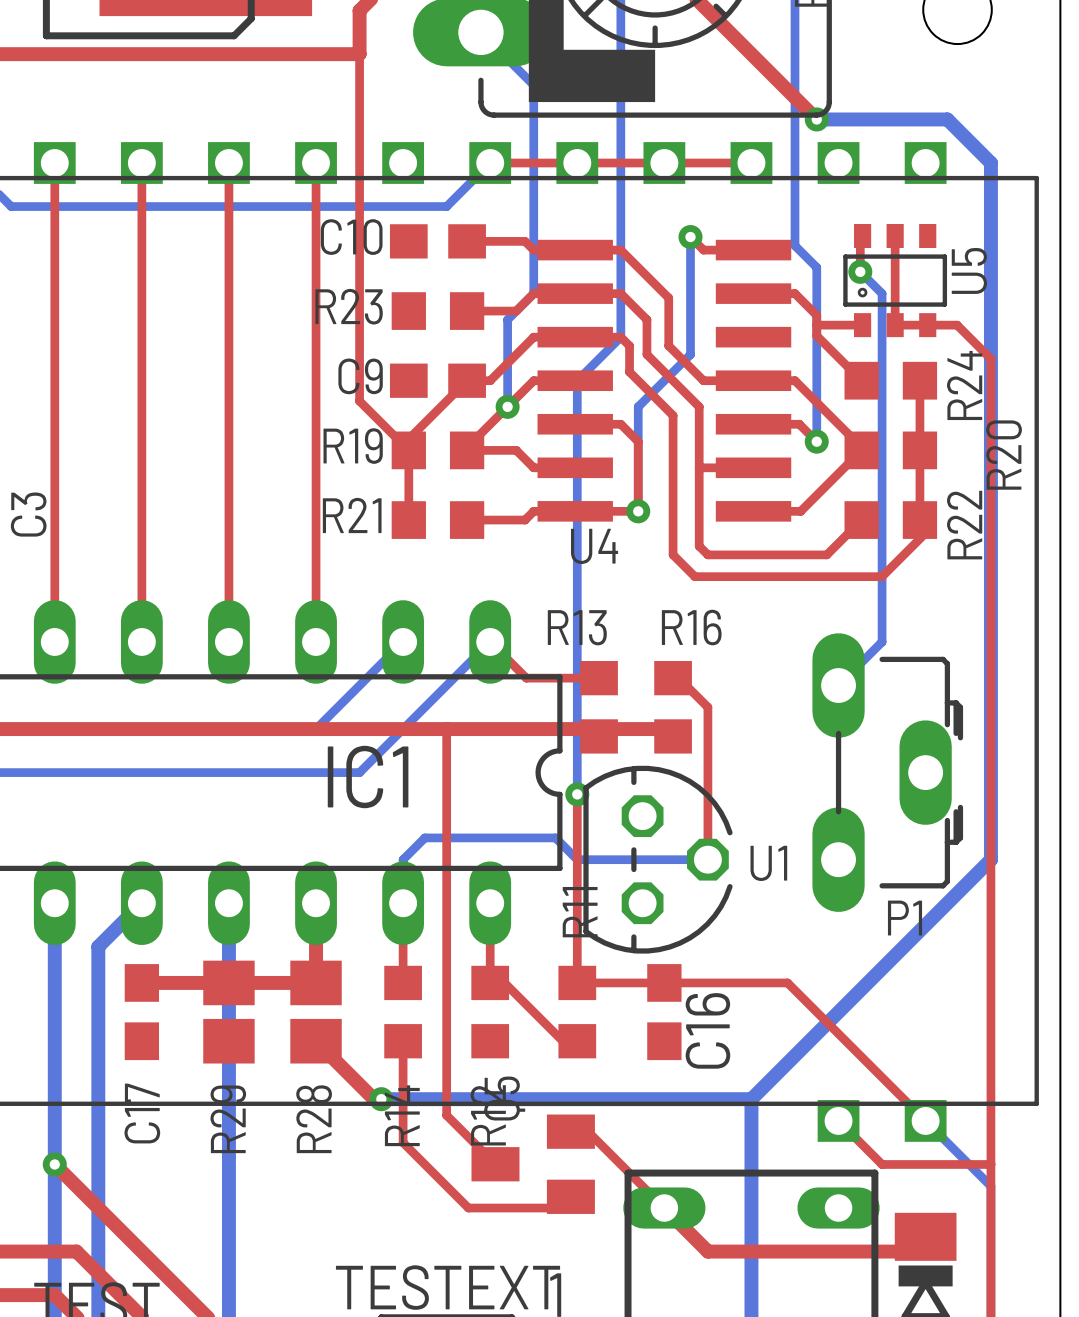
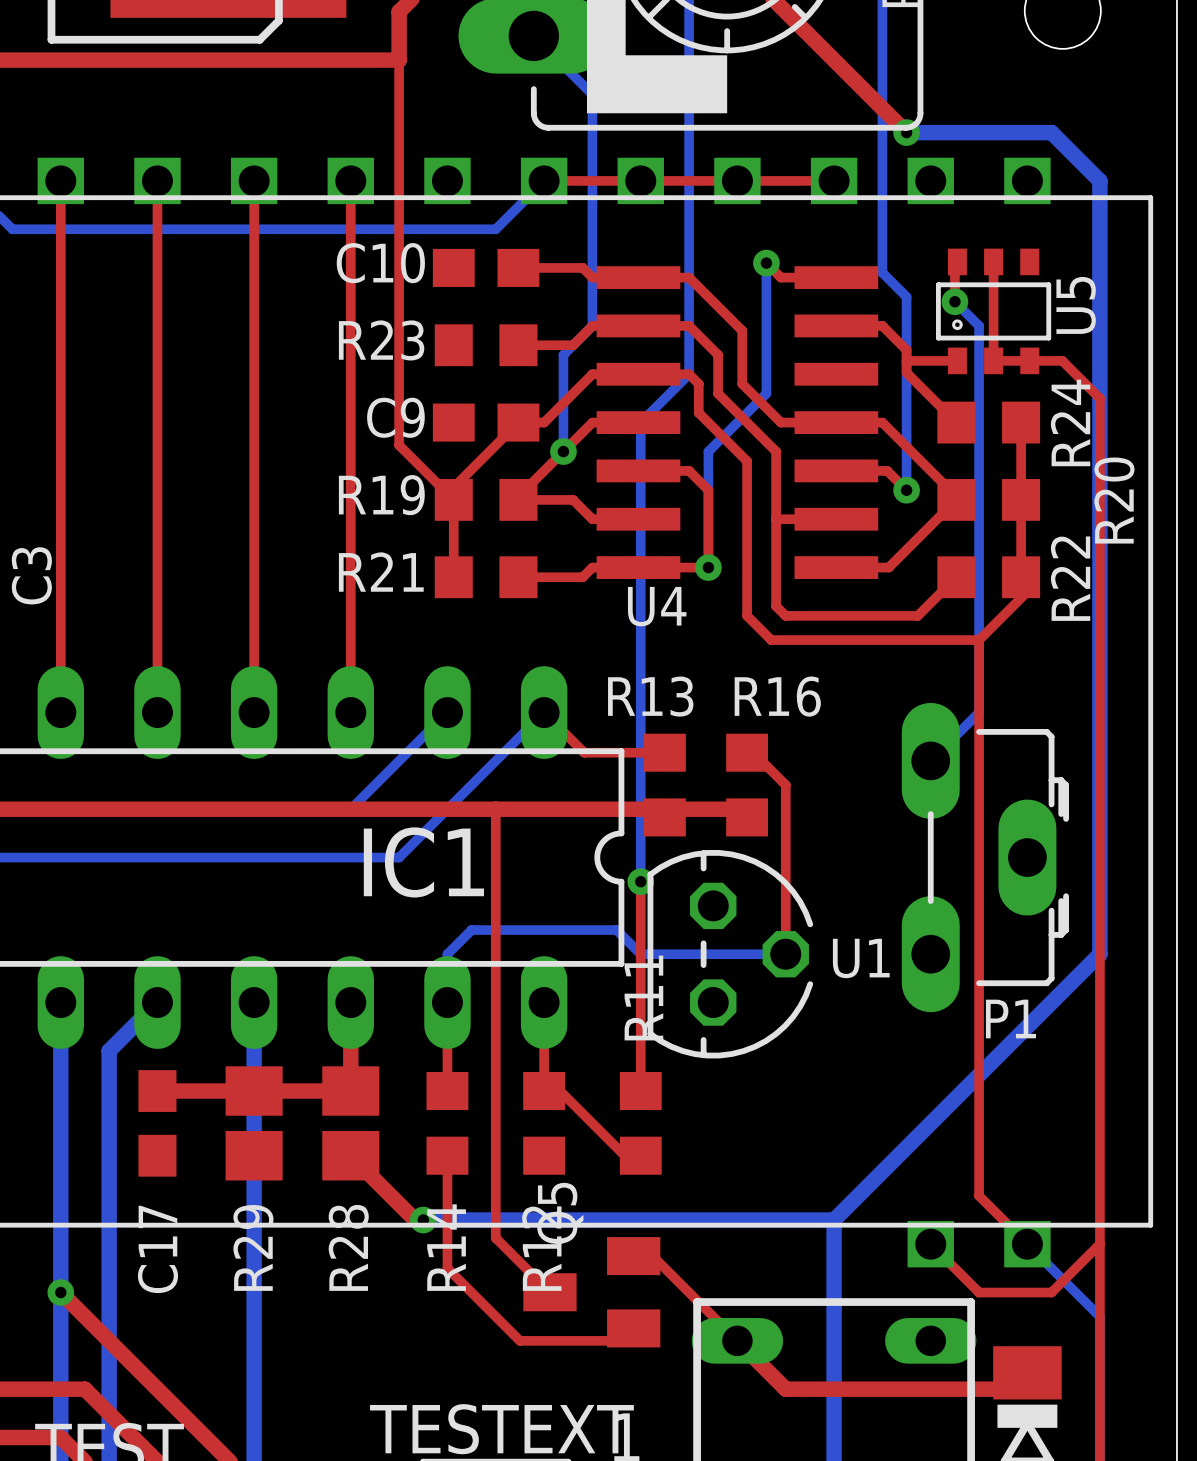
top track: (577, 982) (787, 982) (882, 1077) -> (979, 640) (979, 1195)
C16: (664, 1012) -> none
top track: (947, 1164) (990, 1164) -> (1051, 1292) (1099, 1244)

